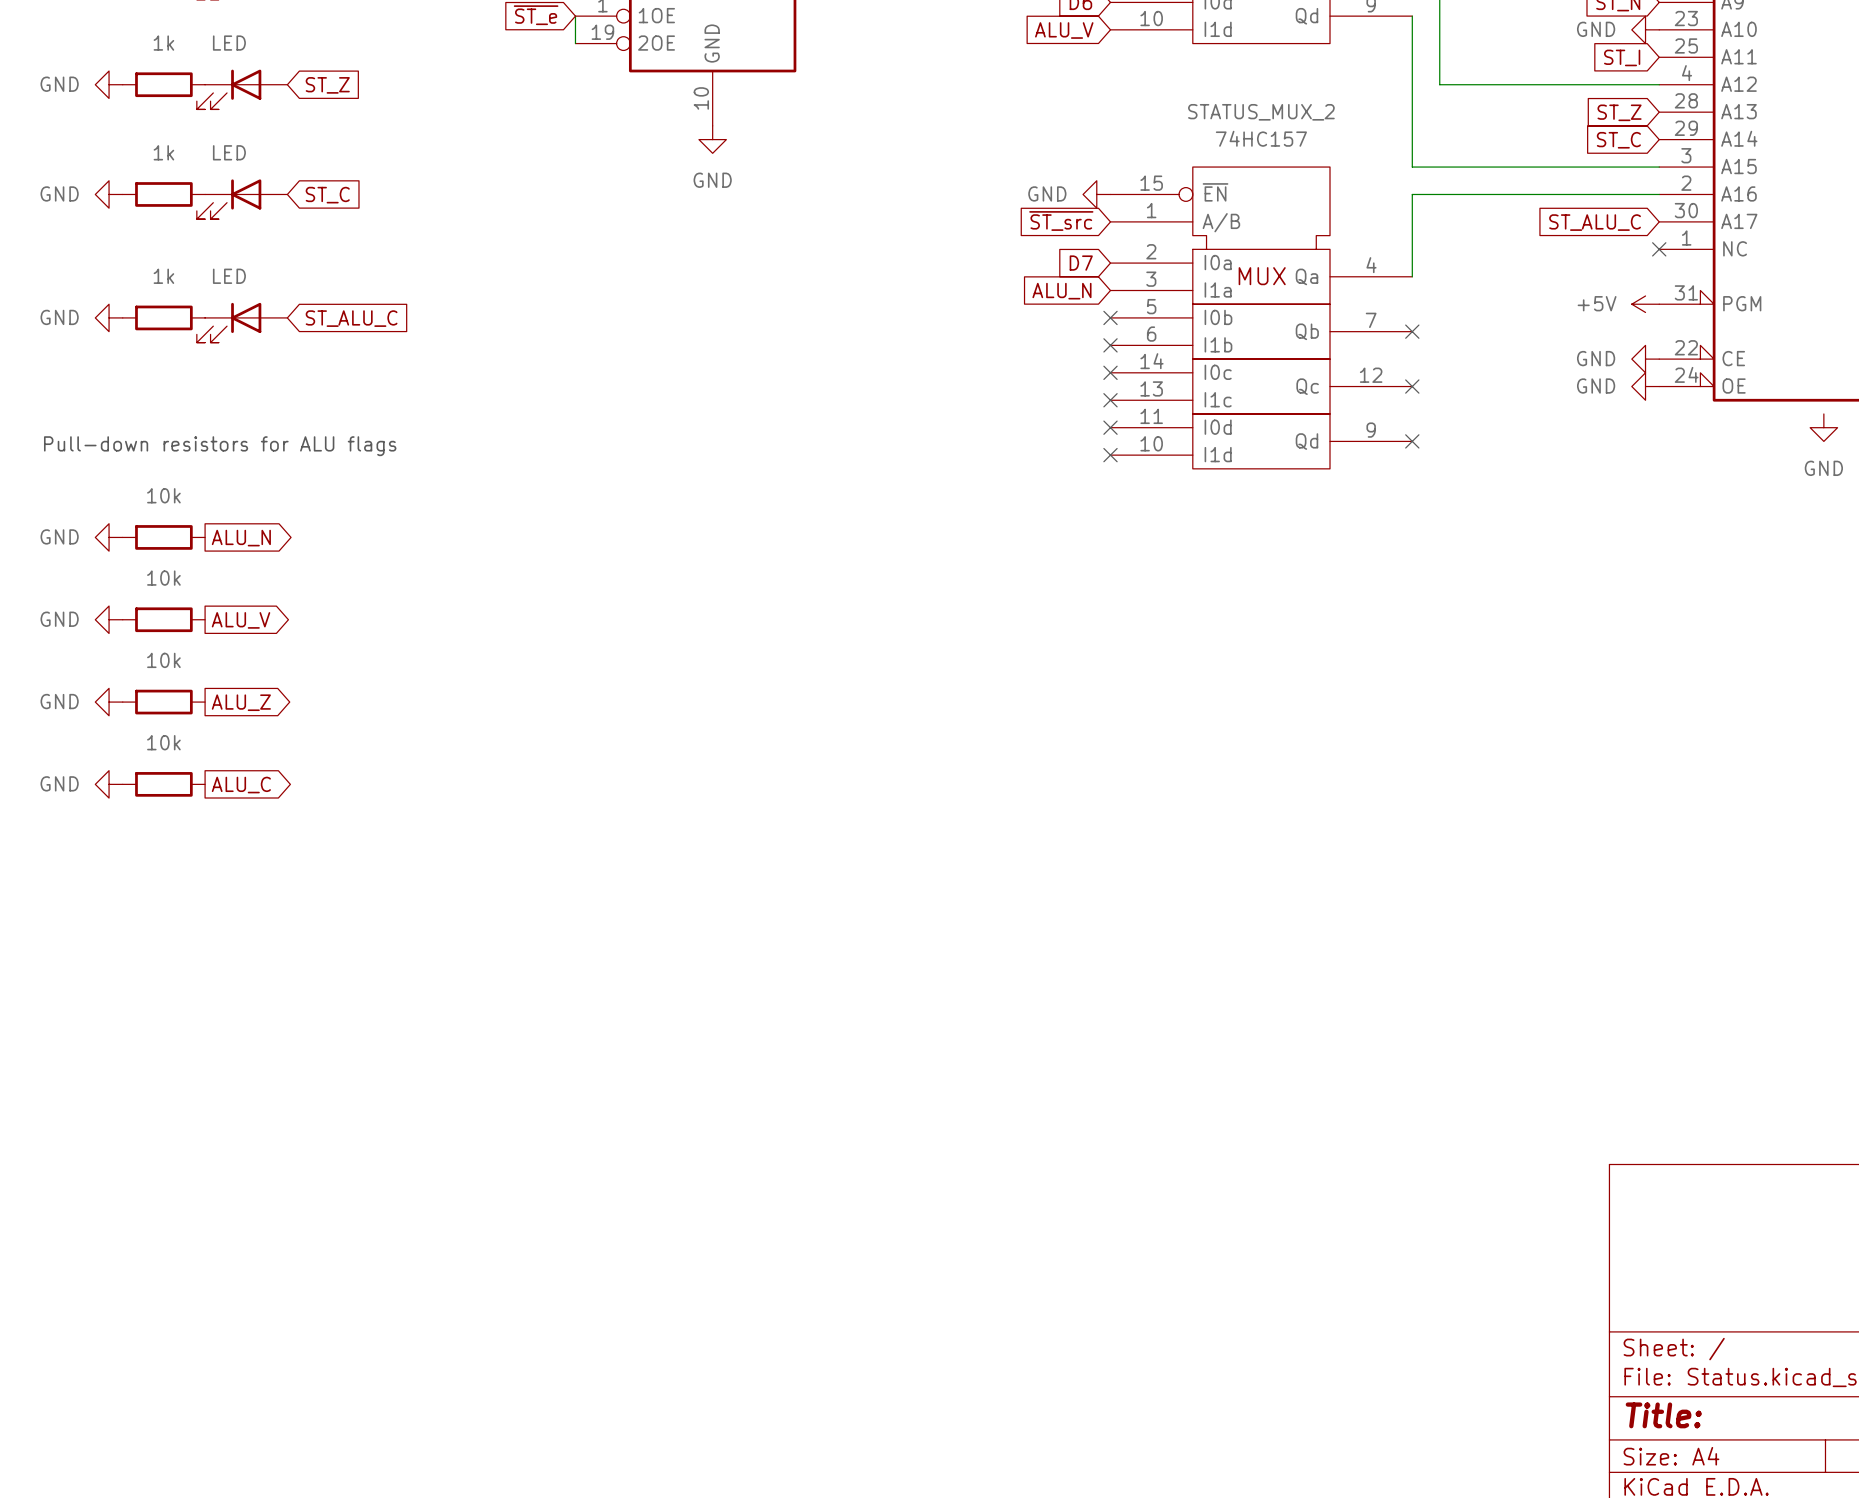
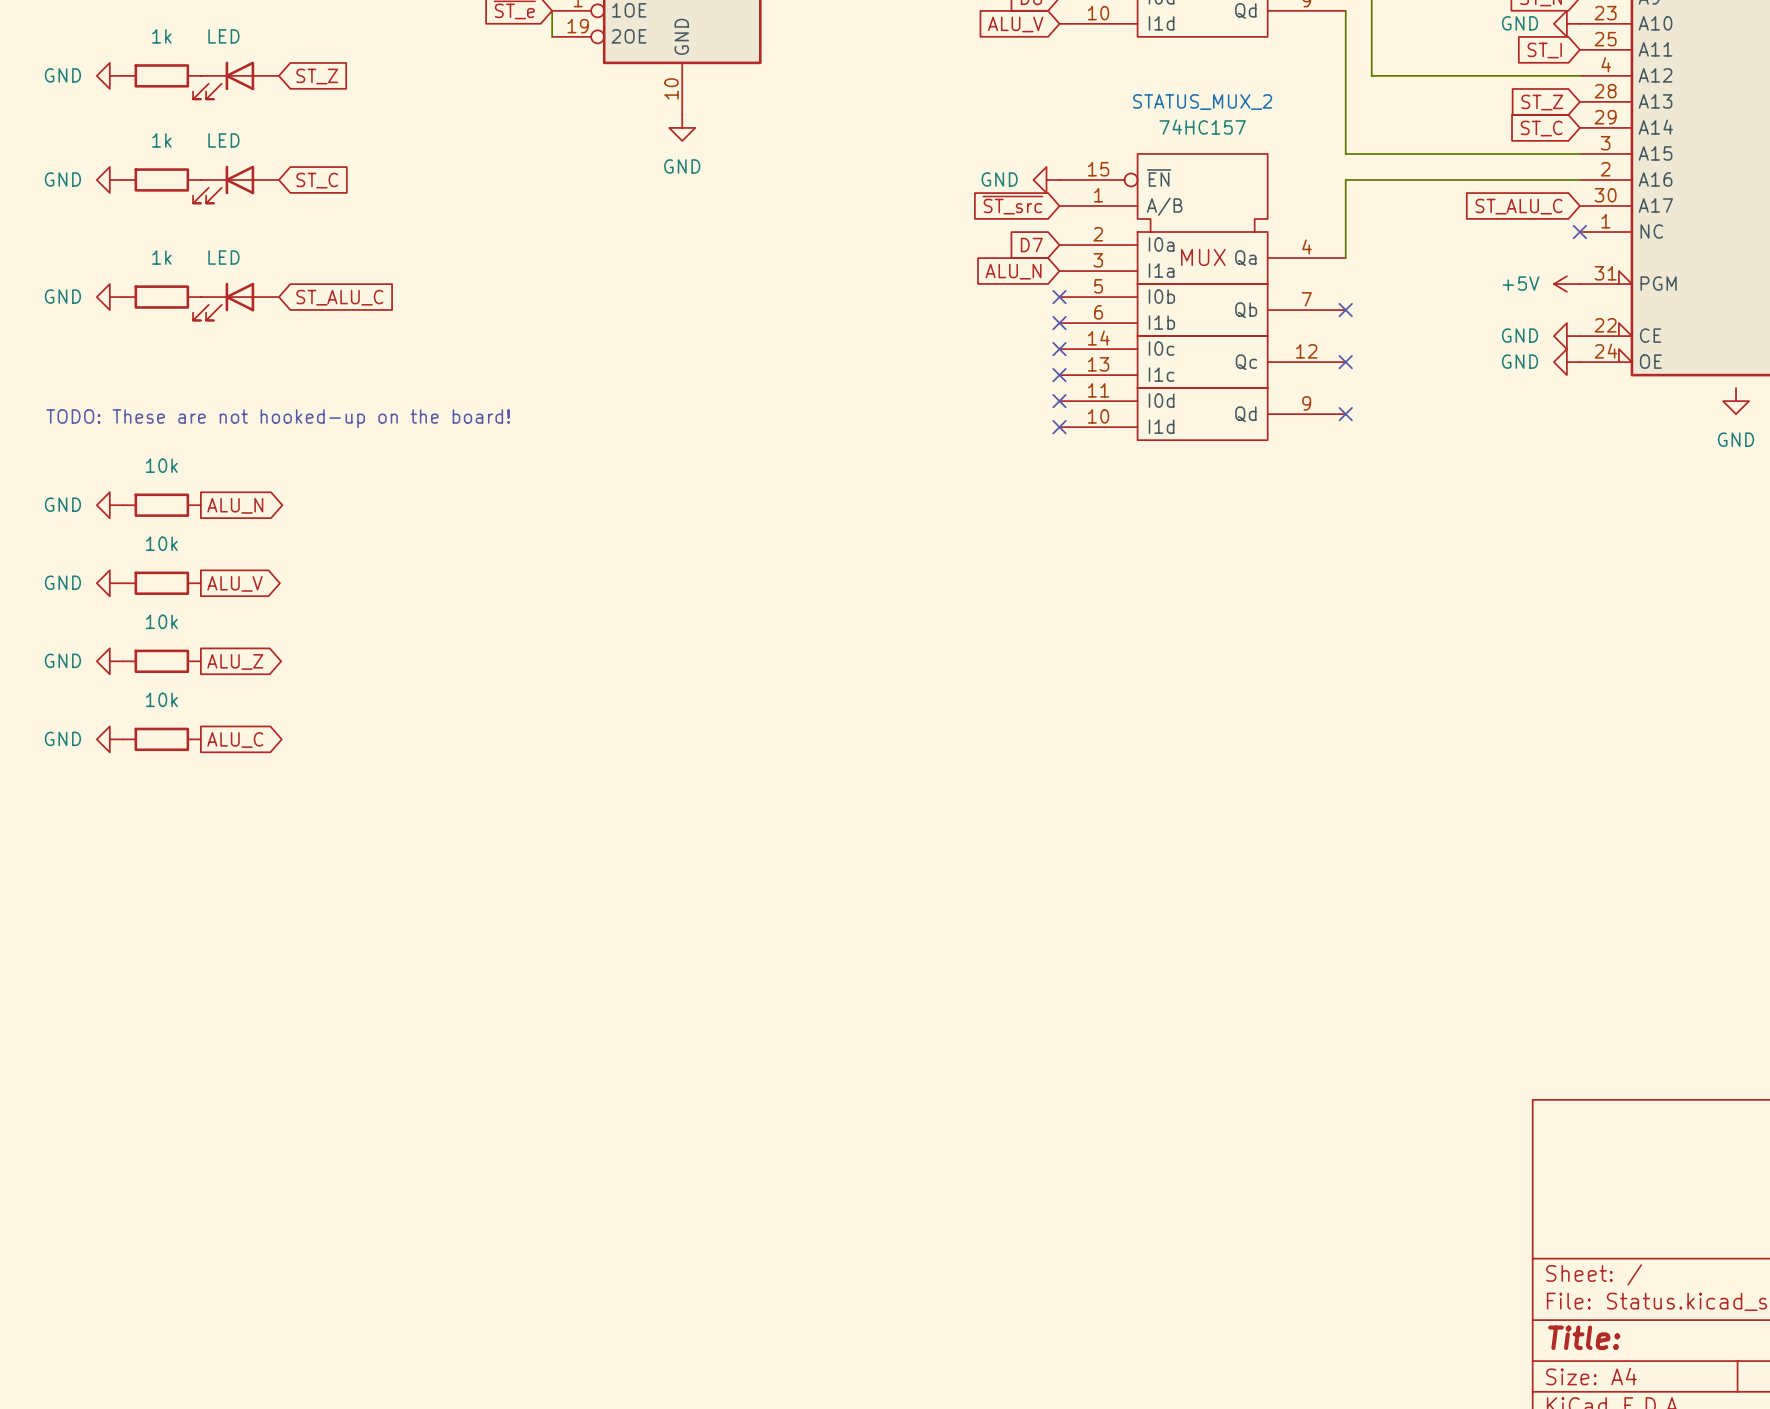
text: Pull-down resistors for ALU flags (220, 446) -> TODO: These are not hooked-up on the board! (278, 418)

